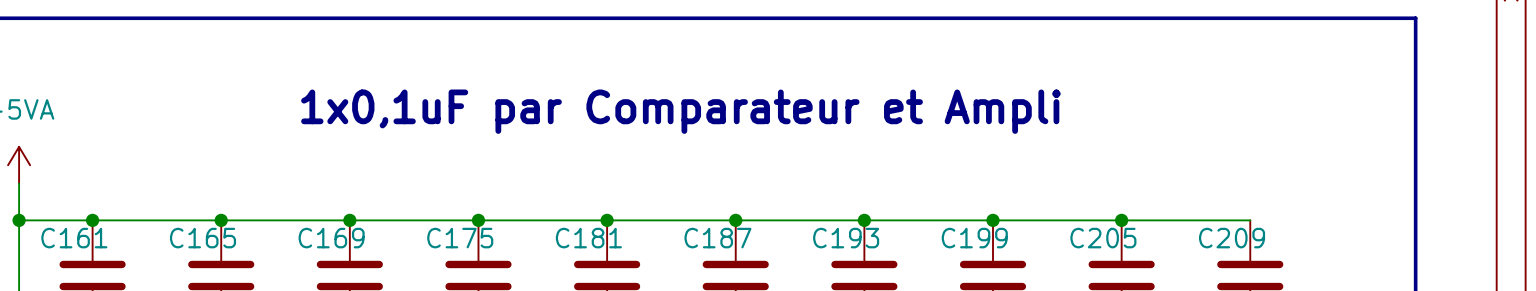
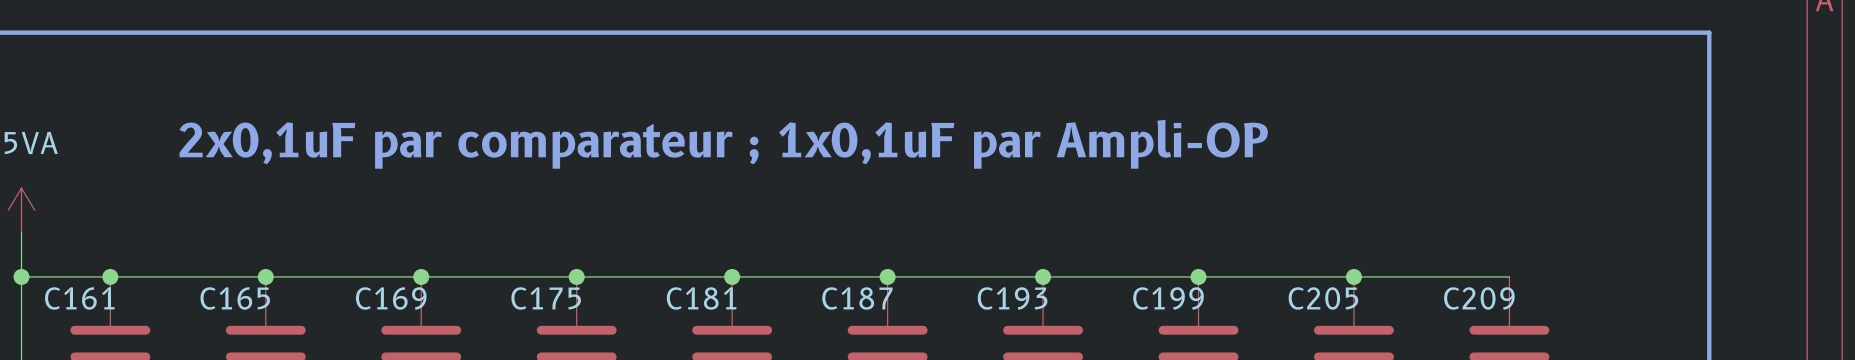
text: 1x0,1uF par Comparateur et Ampli (680, 111) -> none
text: none -> 2x0,1uF par comparateur ; 1x0,1uF par Ampli-OP (723, 144)

